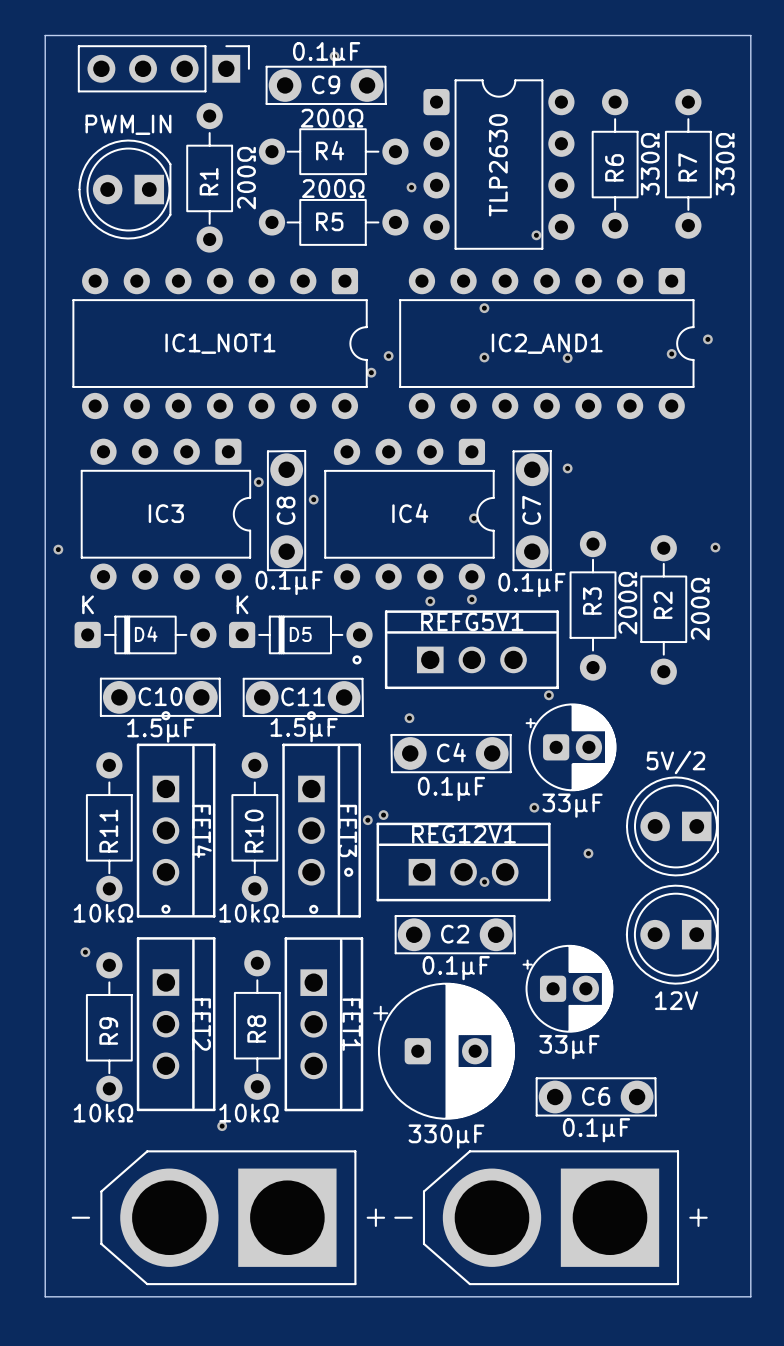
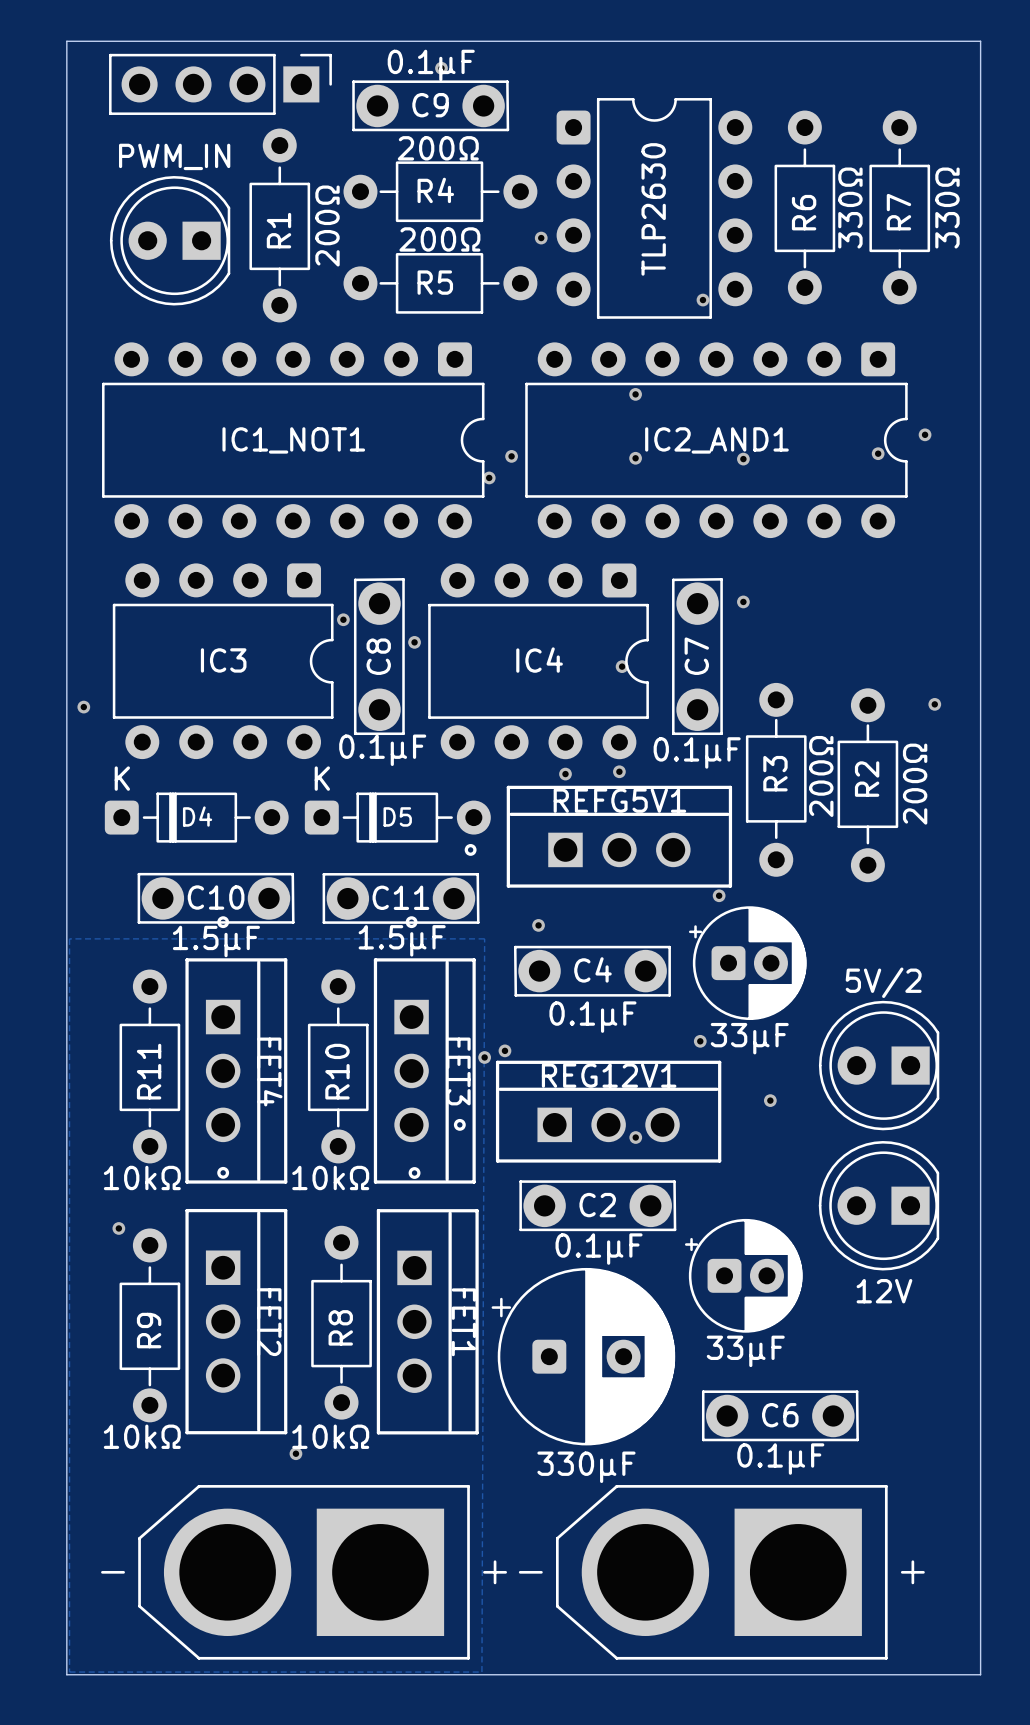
zone outline: none -> (69, 938) (484, 938) (481, 1672) (69, 1672) (69, 938)

